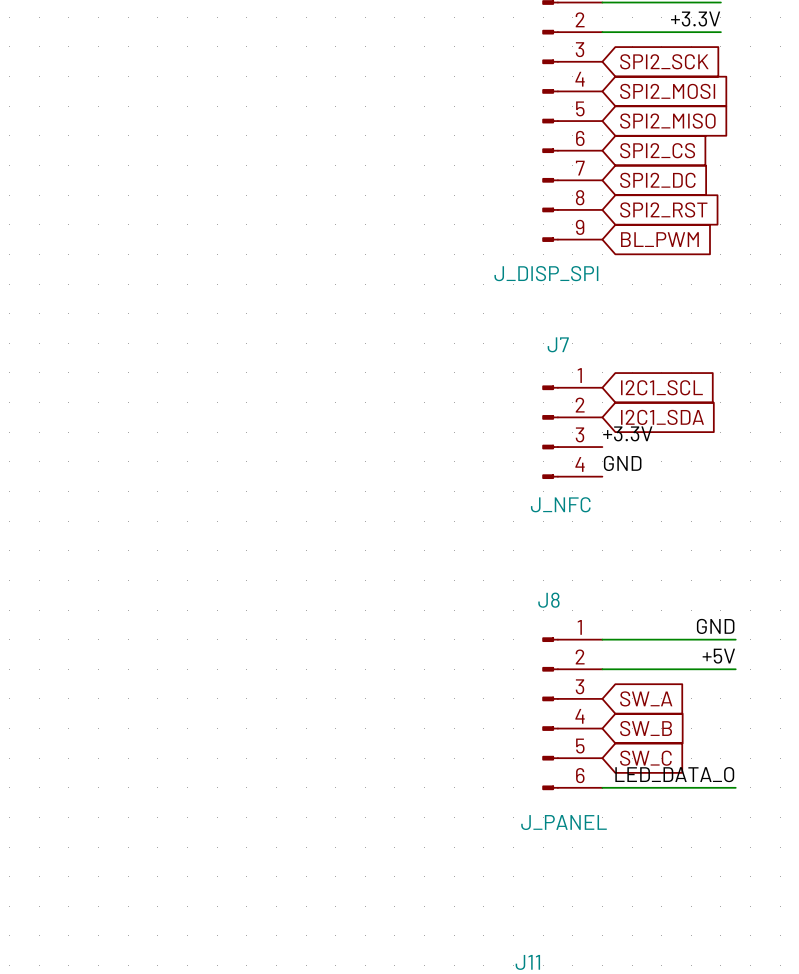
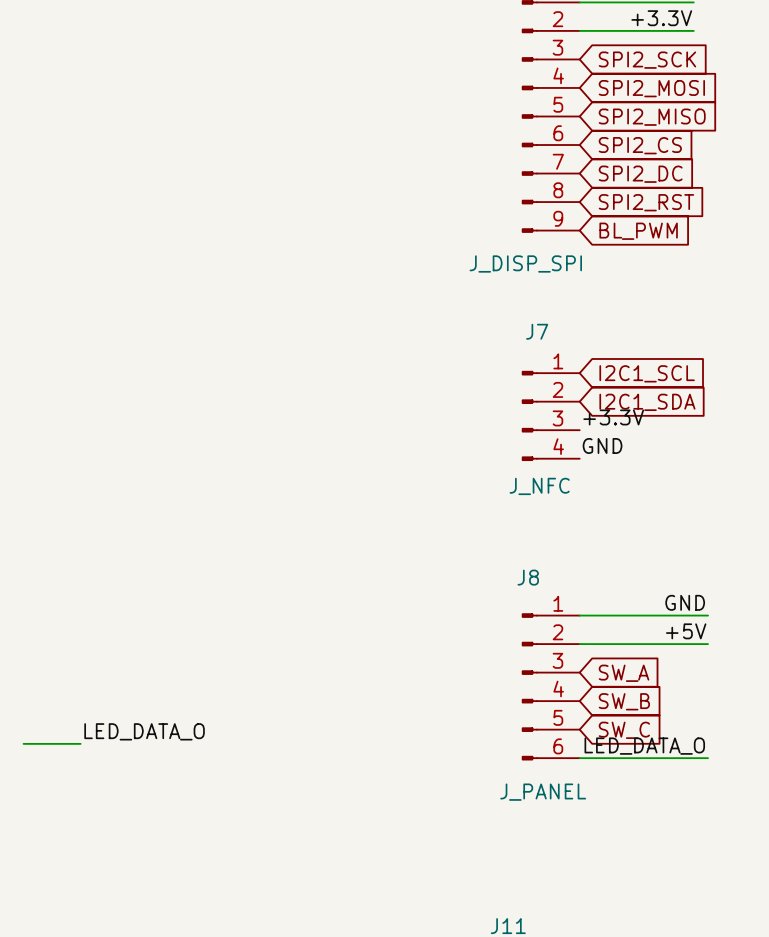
label: none -> LED_DATA_O (144, 731)
wire: none -> (23, 743) (80, 743)

